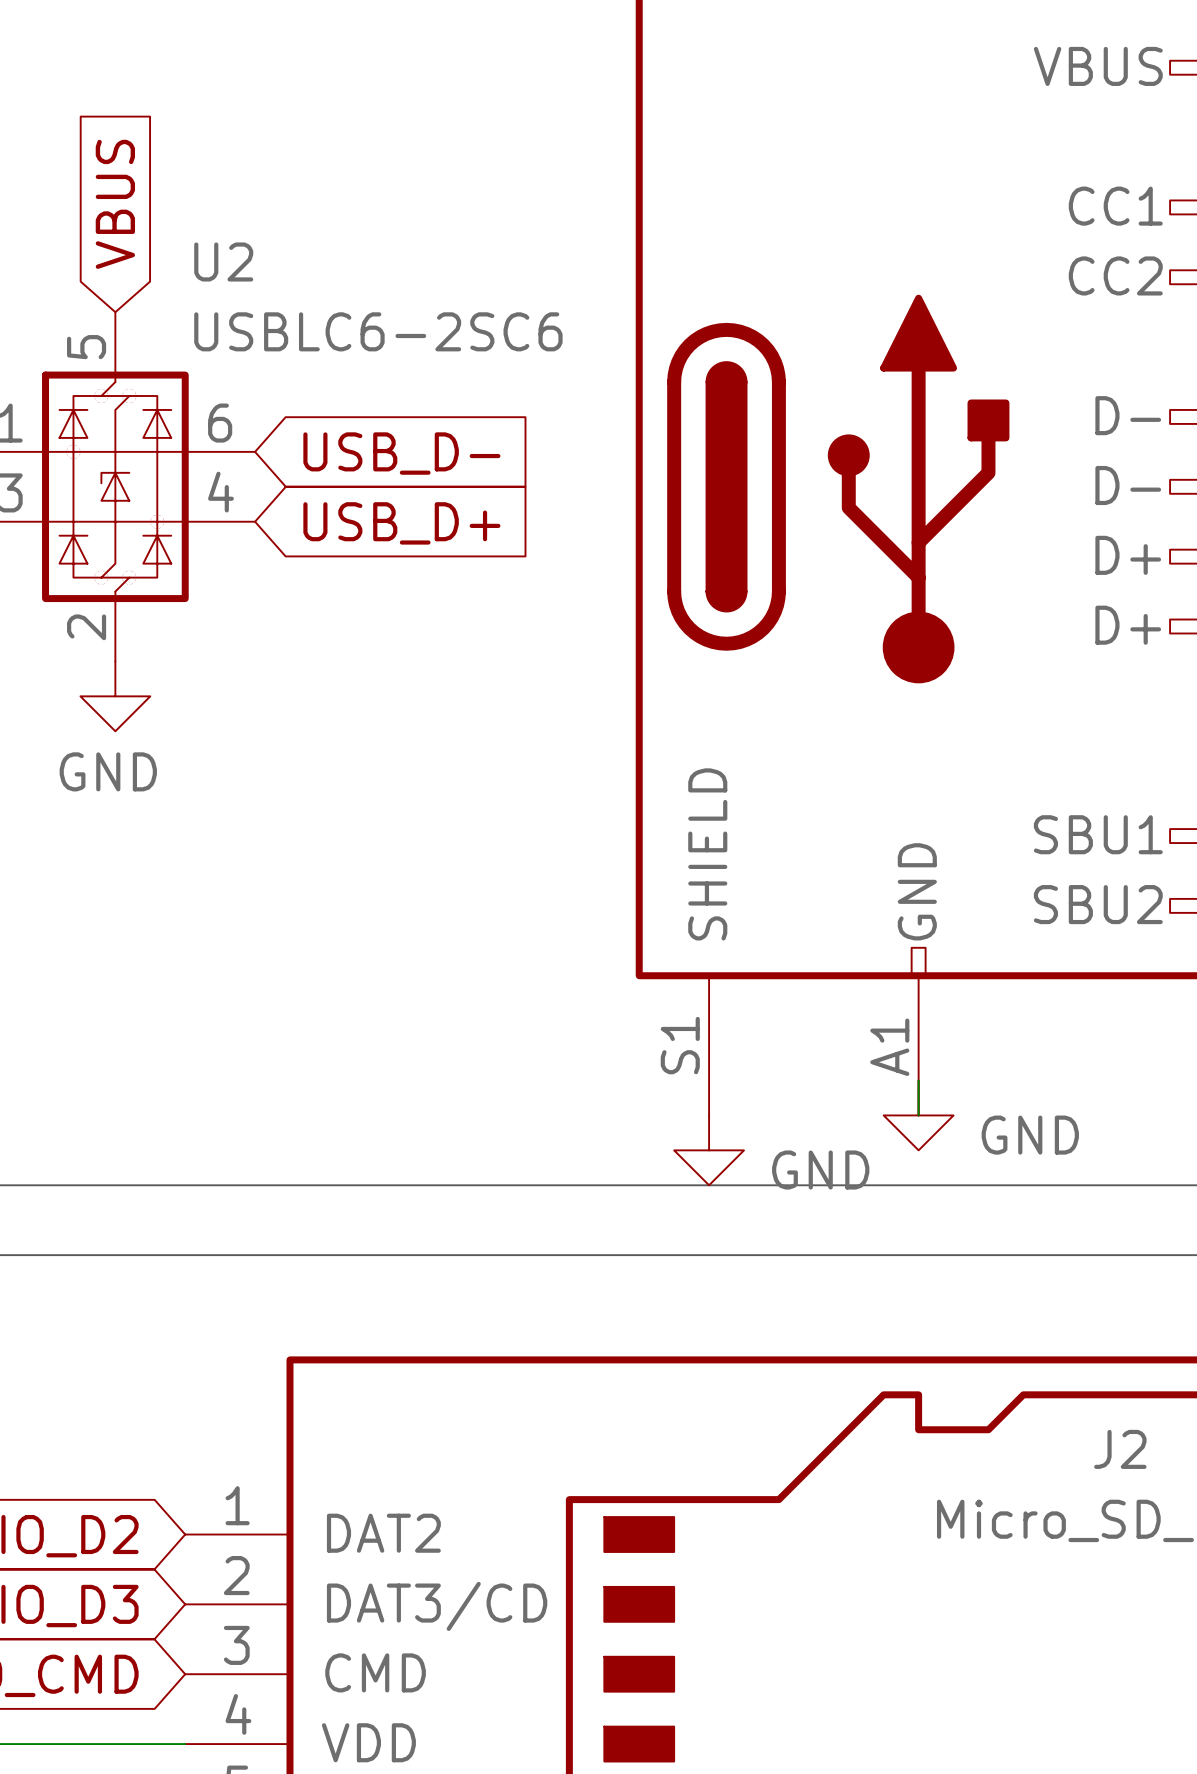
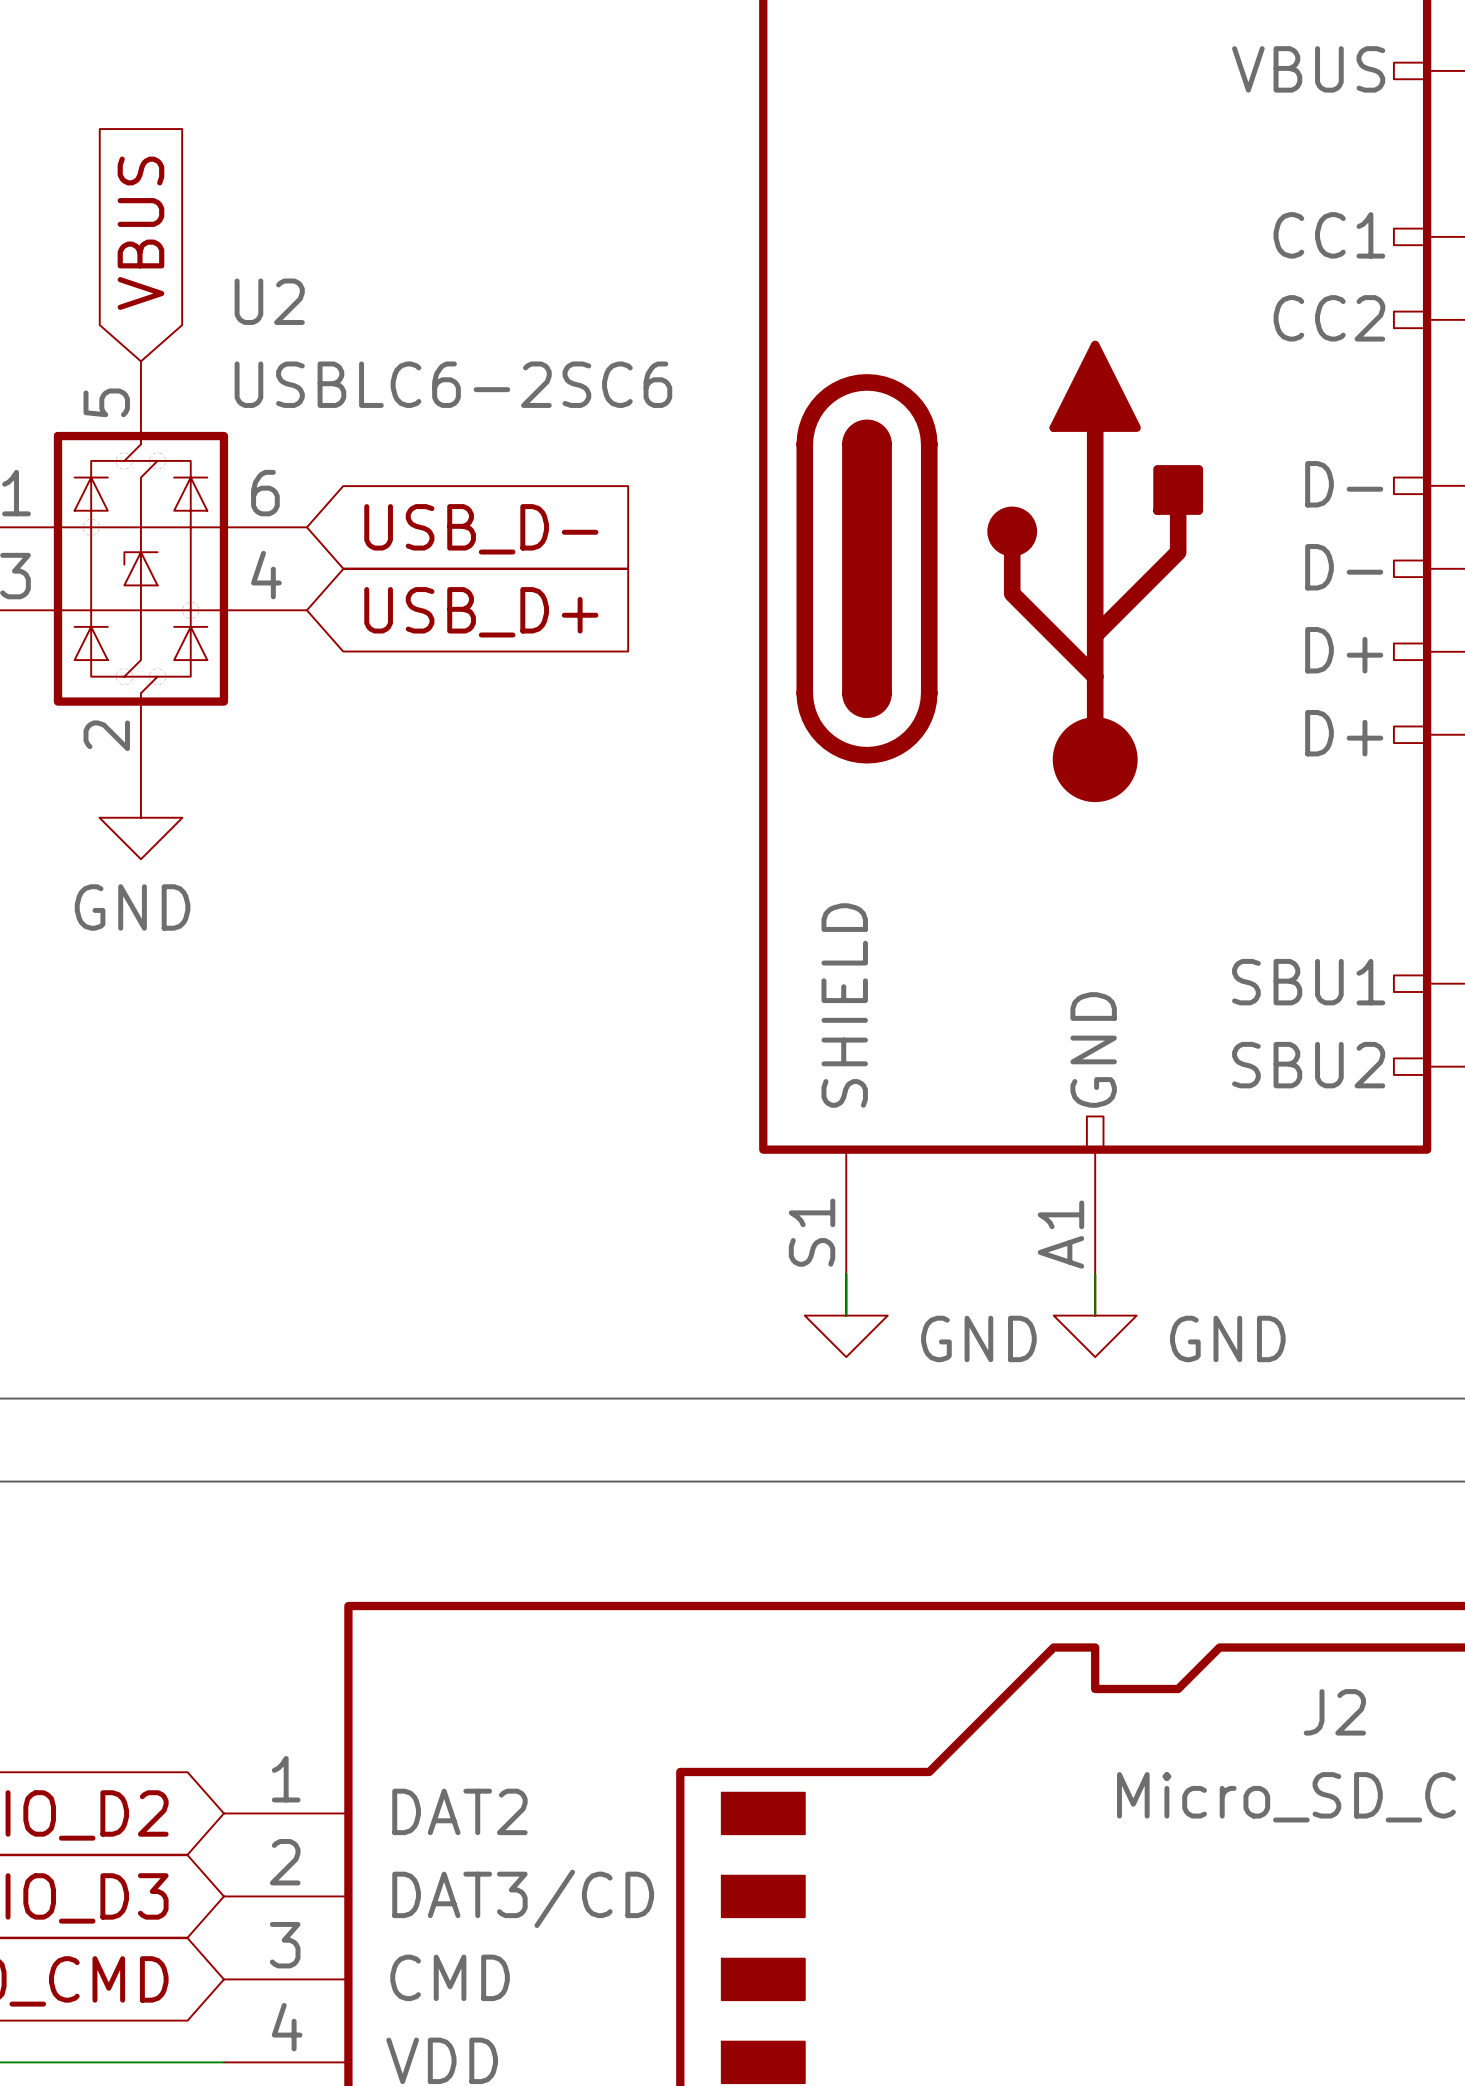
power symbol position: GND (709, 1150) -> GND (846, 1315)

